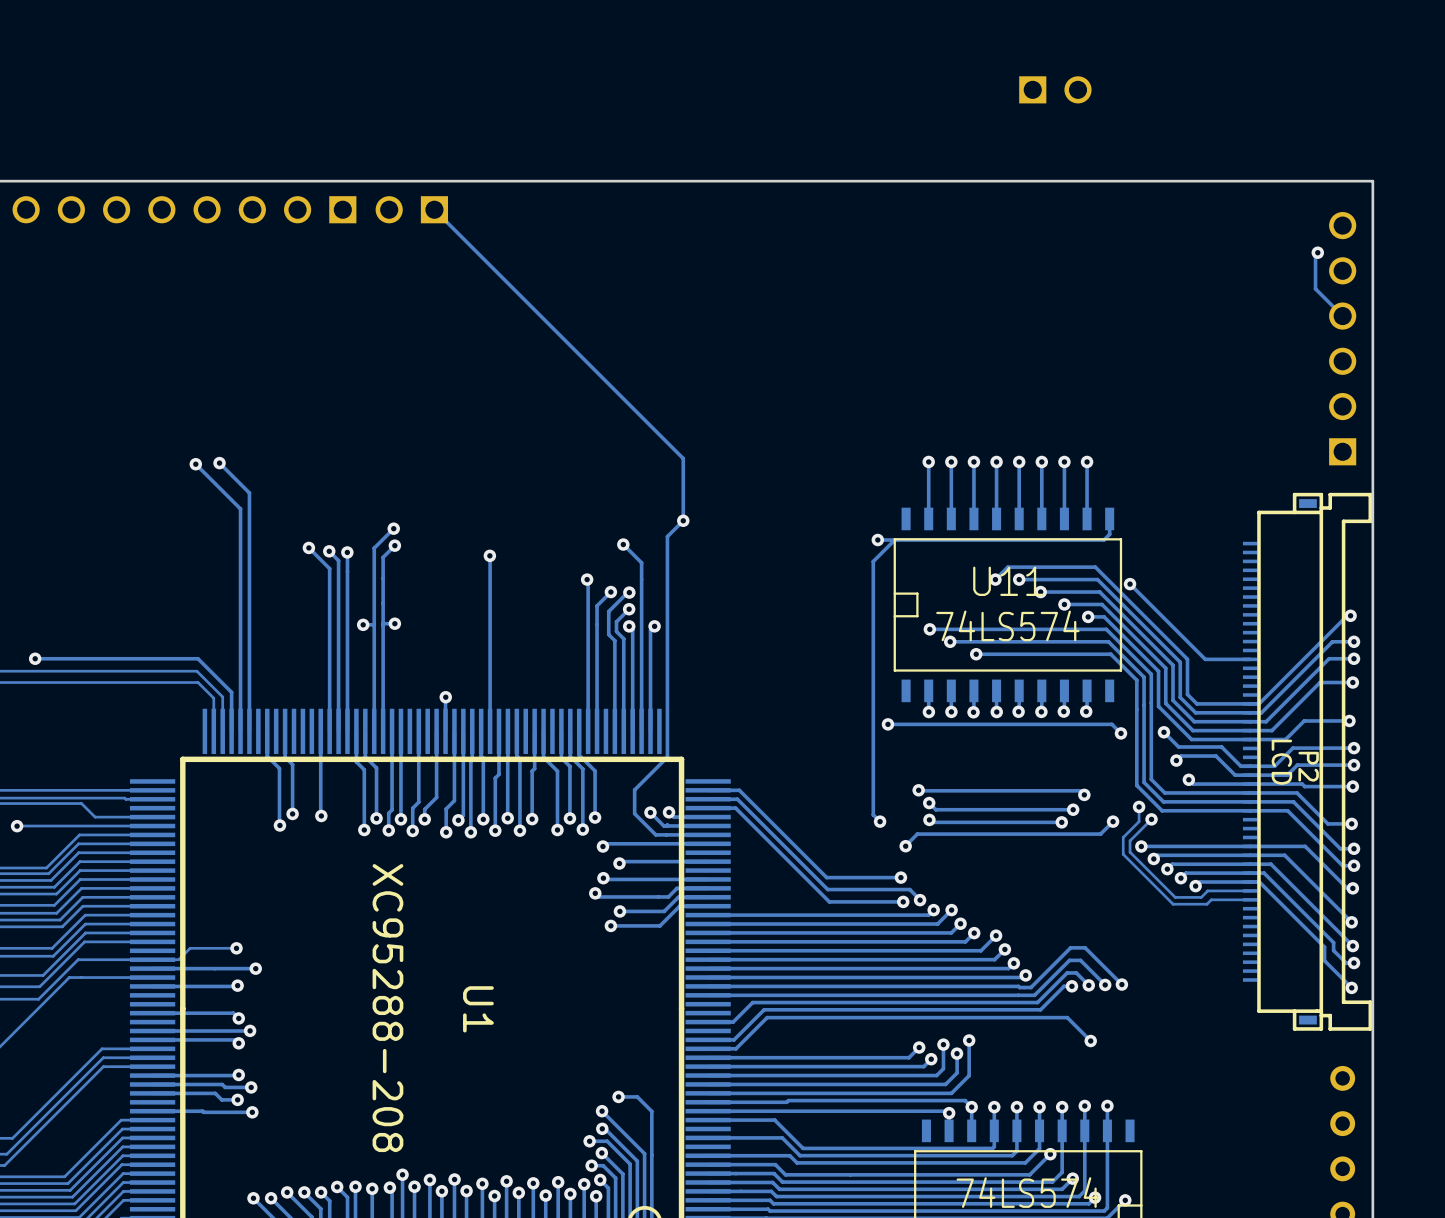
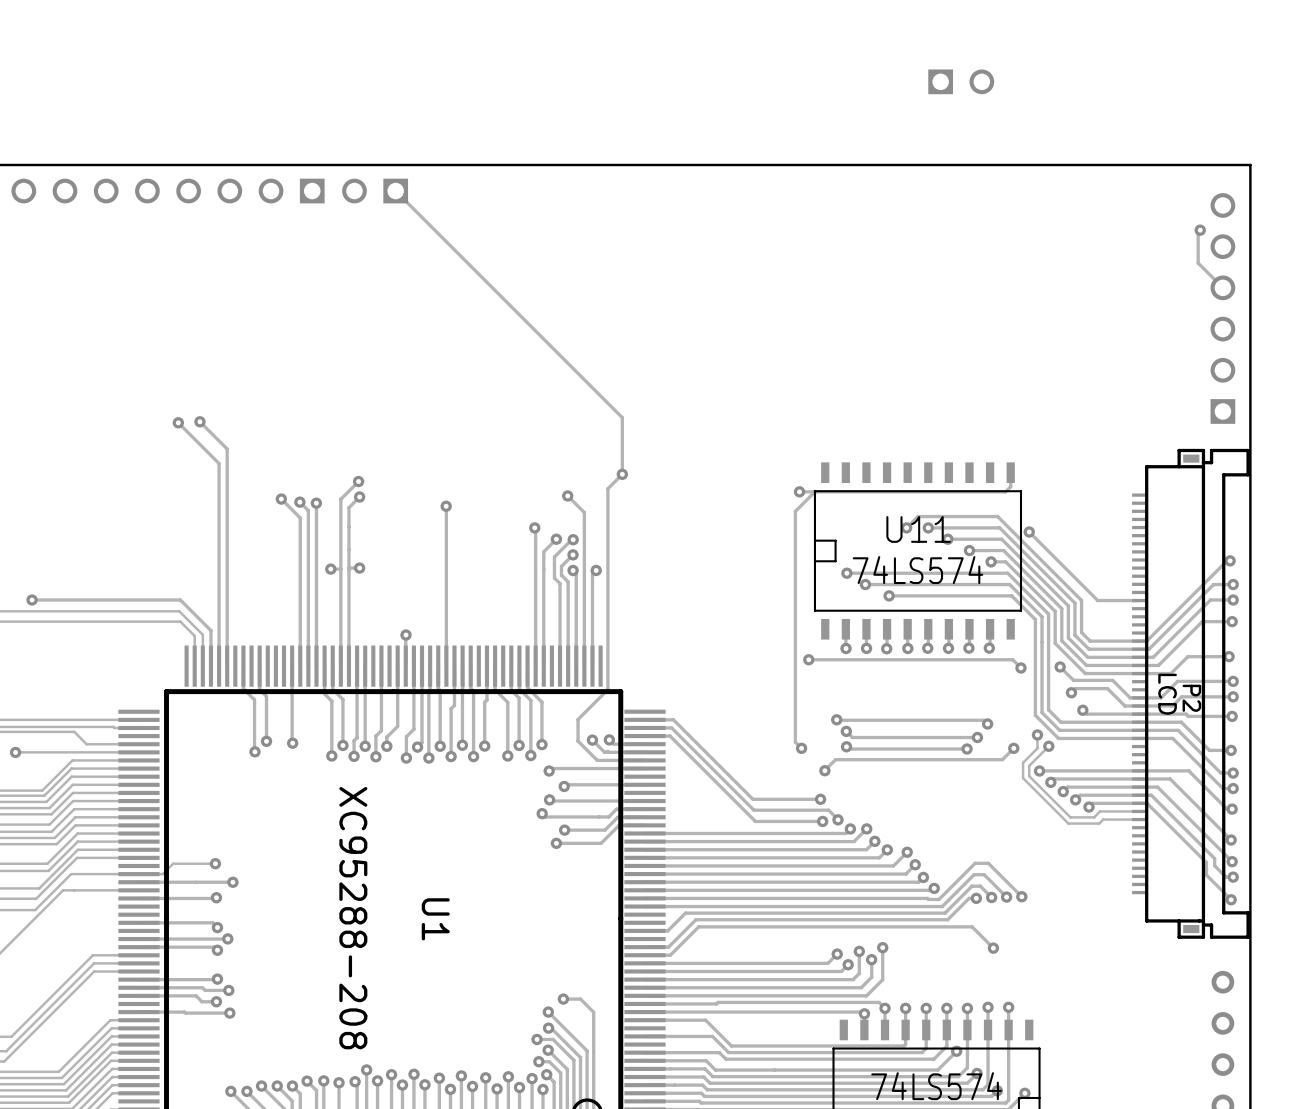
track: (928, 461) (928, 518) -> none
via: (928, 461) -> none
track: (951, 461) (951, 518) -> none
via: (951, 461) -> none
track: (973, 461) (973, 518) -> none
via: (973, 461) -> none
track: (996, 461) (996, 518) -> none
via: (996, 461) -> none
track: (1019, 461) (1019, 518) -> none
via: (1019, 461) -> none
track: (1041, 461) (1041, 518) -> none
via: (1041, 461) -> none
track: (1064, 461) (1064, 518) -> none
via: (1064, 461) -> none
track: (1087, 461) (1087, 518) -> none
via: (1087, 461) -> none

